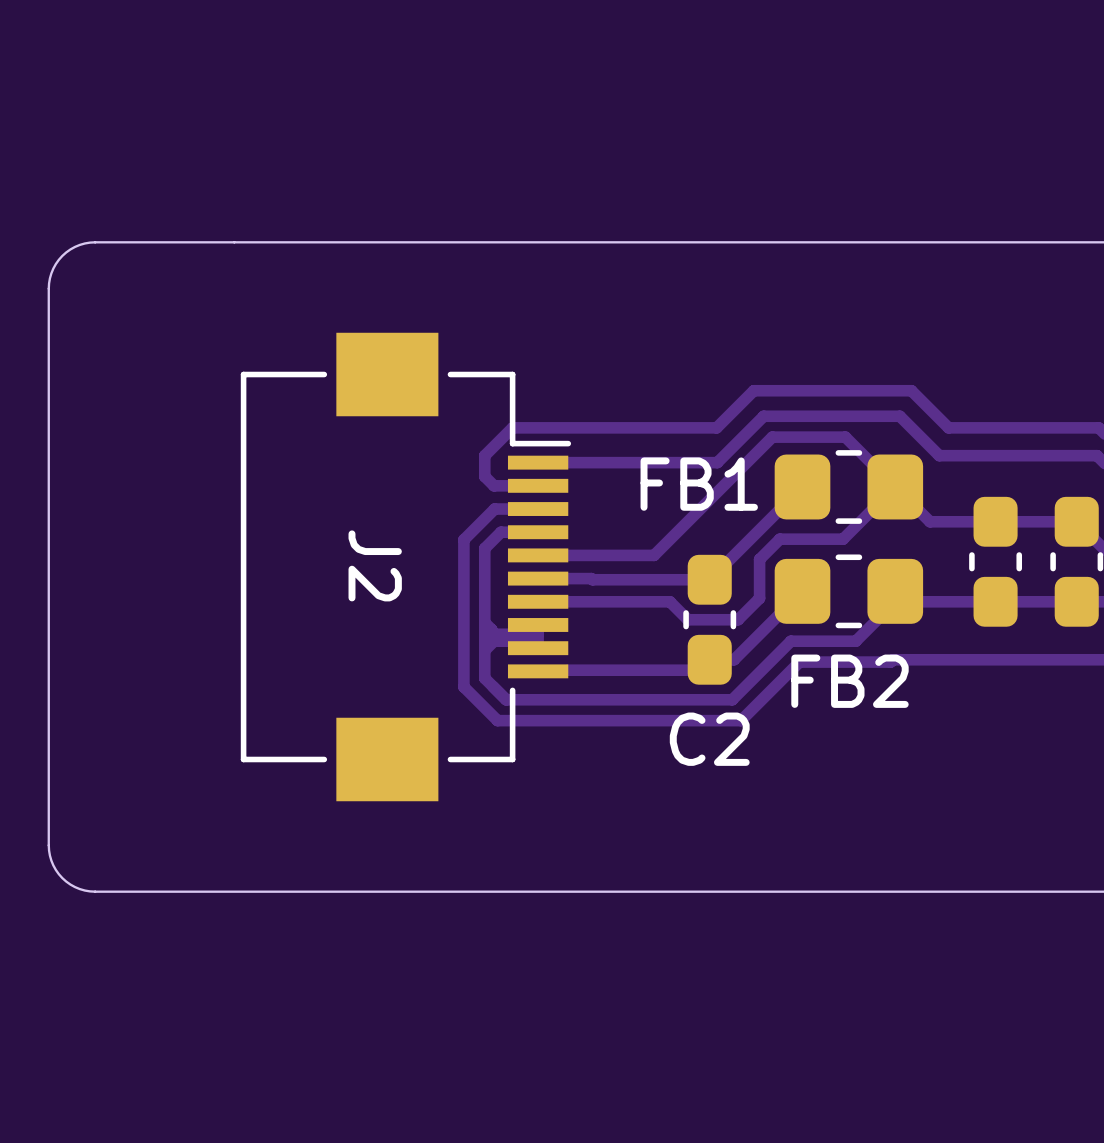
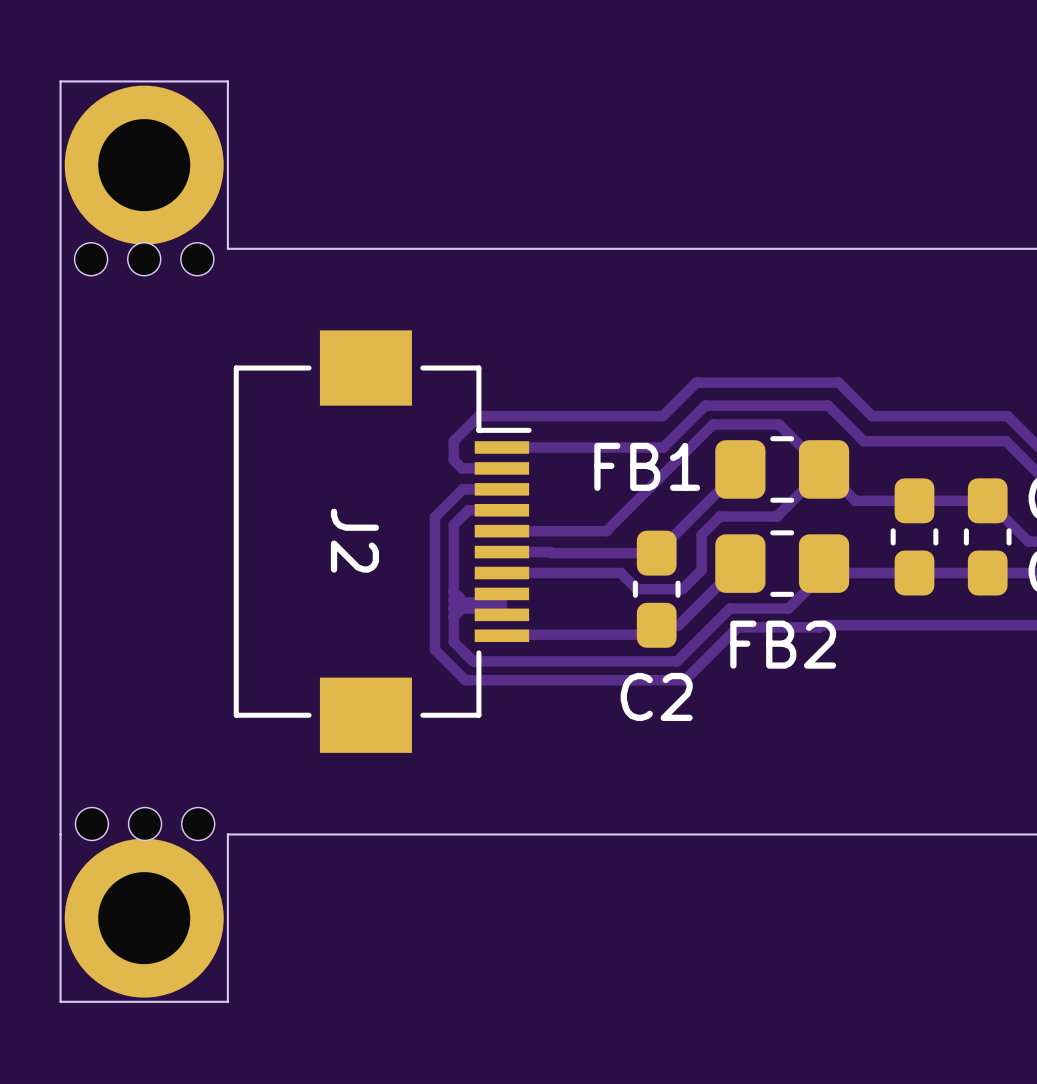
part: none -> (144, 165)
board edge: (234, 242) (84, 243) (70, 249) (58, 259) (51, 273) (48, 288) -> (227, 248) (227, 81) (60, 81) (60, 290)
part: none -> (144, 259)
board edge: (48, 845) (51, 860) (58, 874) (70, 884) (84, 890) (234, 891) -> (60, 792) (60, 1001) (227, 1001) (227, 834)
part: none -> (145, 824)
part: none -> (144, 918)

